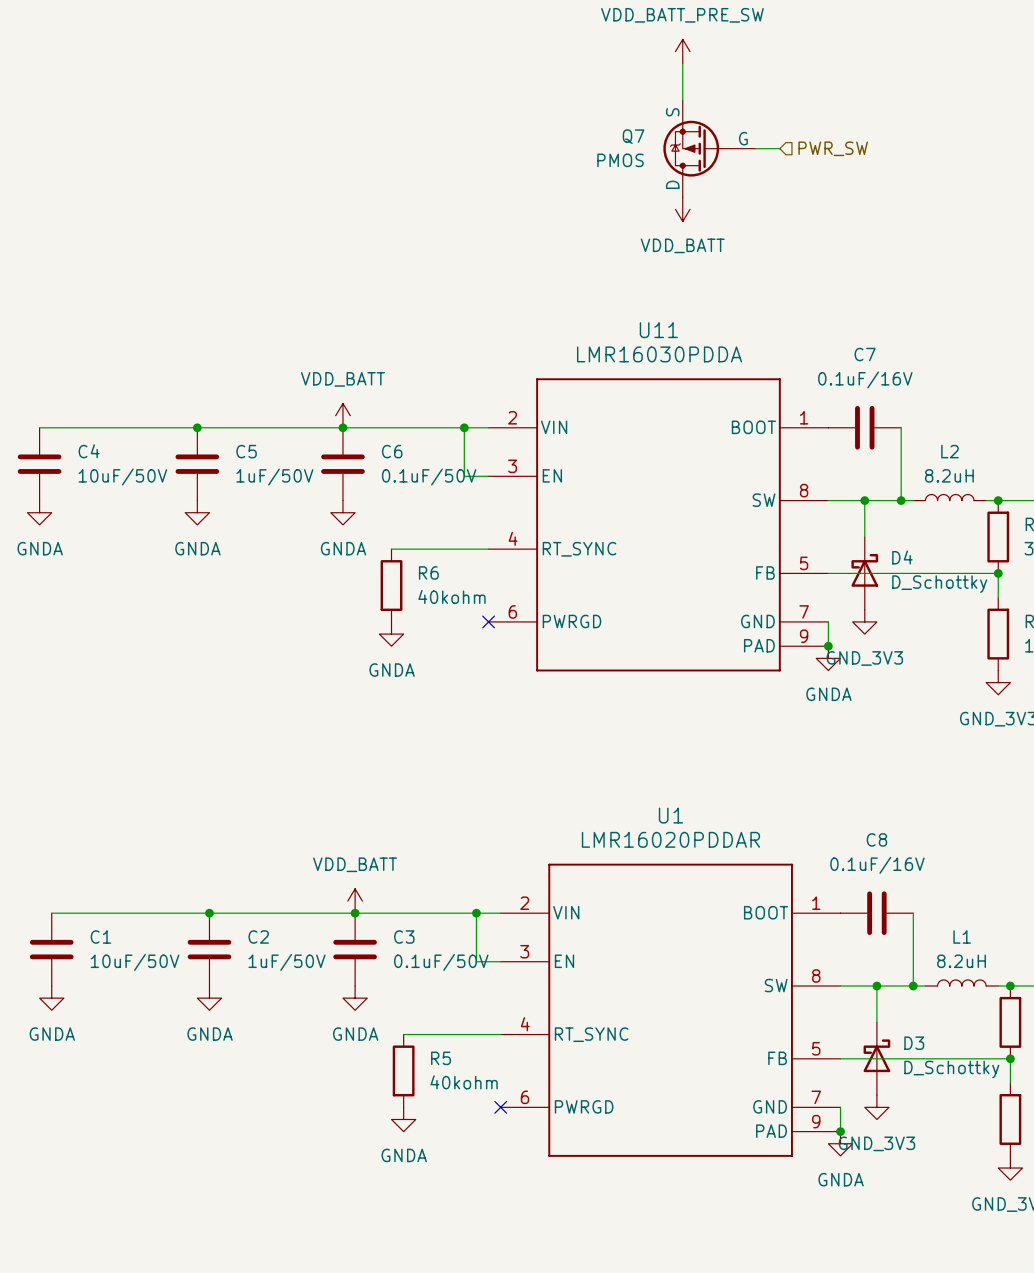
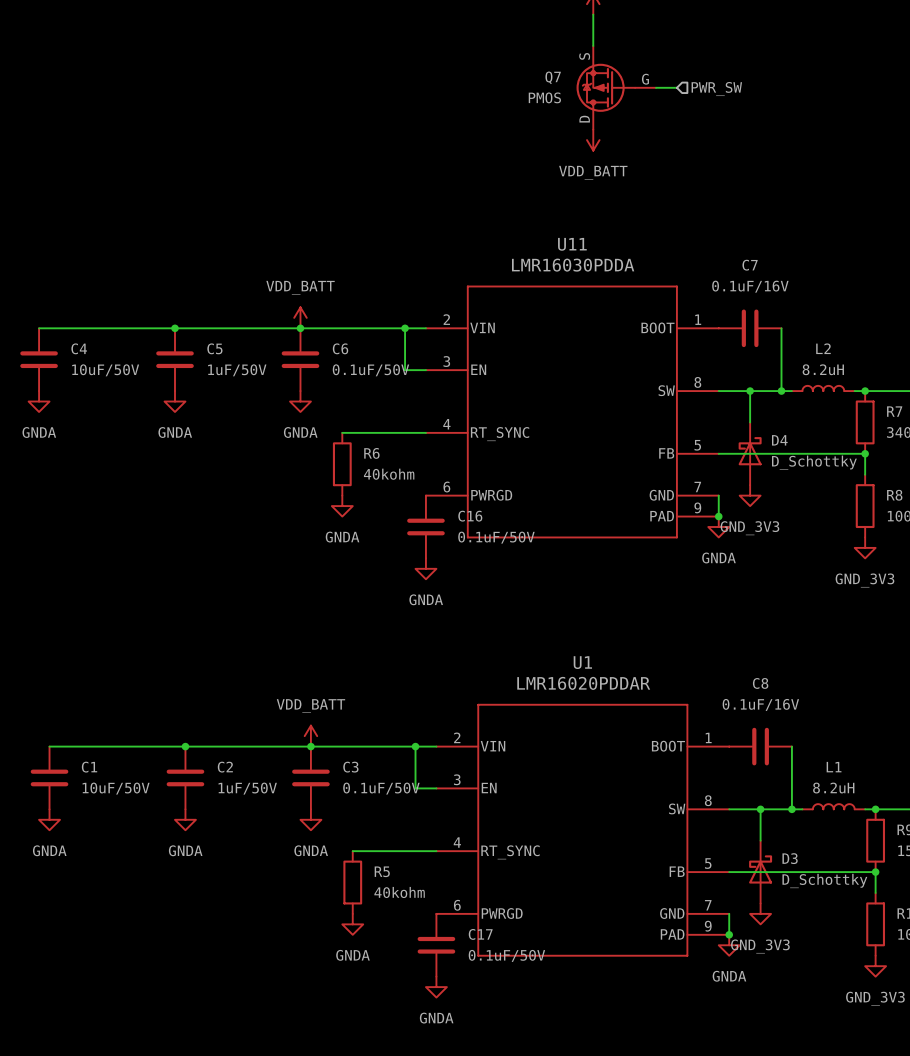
no-connect mark: (488, 621) -> none
C16: none -> 0.1uF/50V (425, 527)
power symbol: none -> GNDA (425, 568)
no-connect mark: (500, 1107) -> none
C17: none -> 0.1uF/50V (436, 945)
power symbol: none -> GNDA (436, 987)

